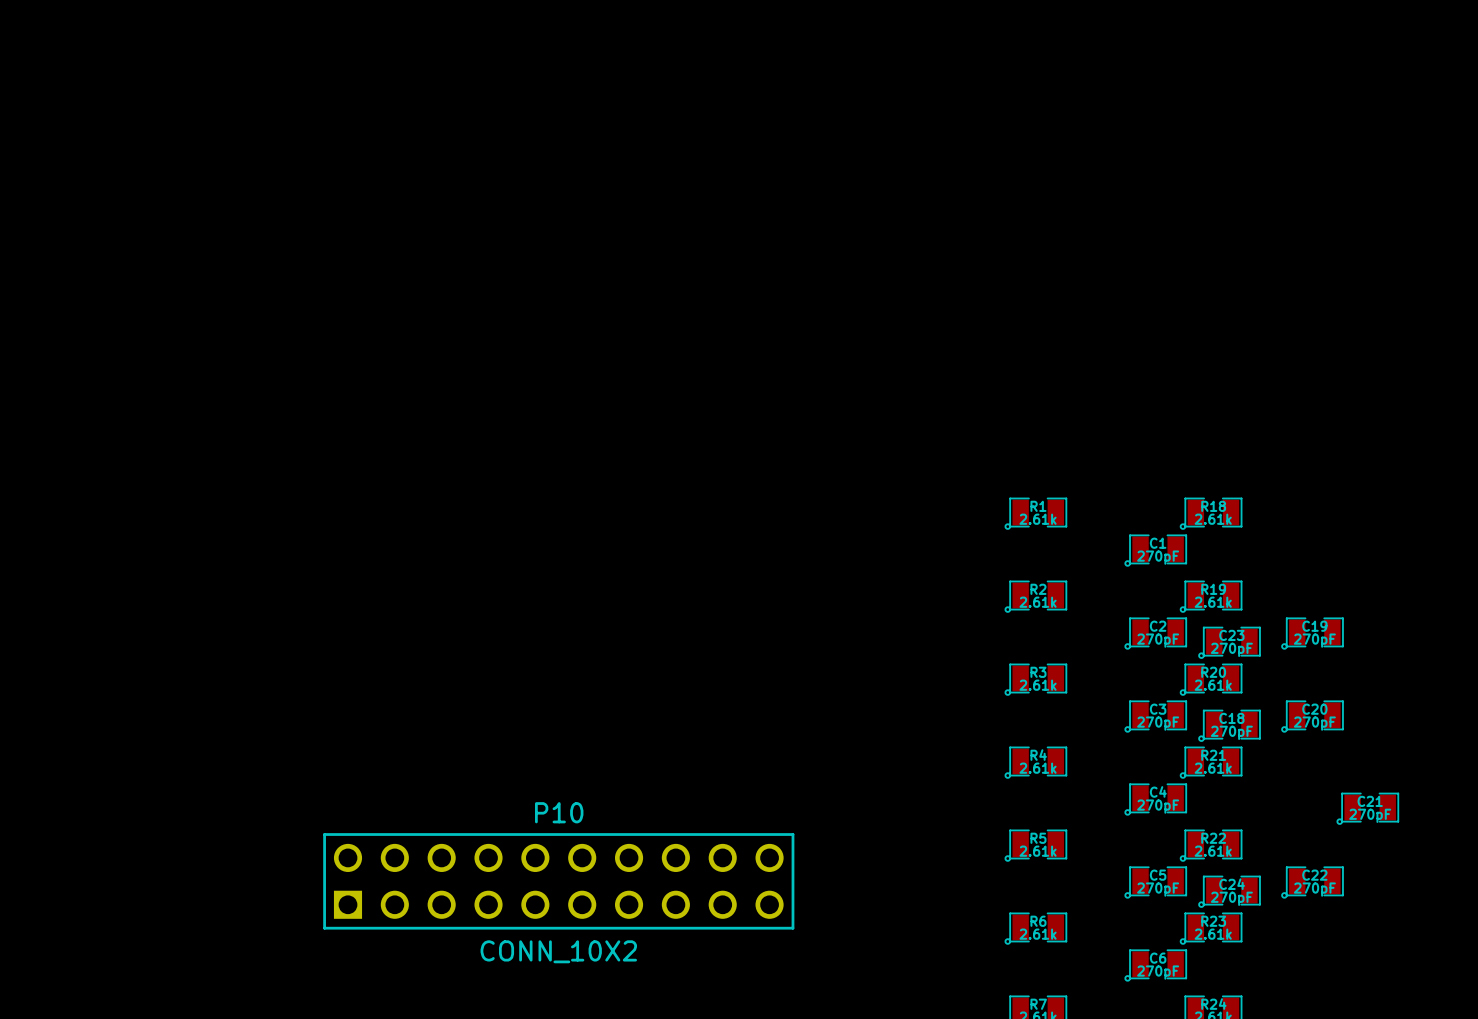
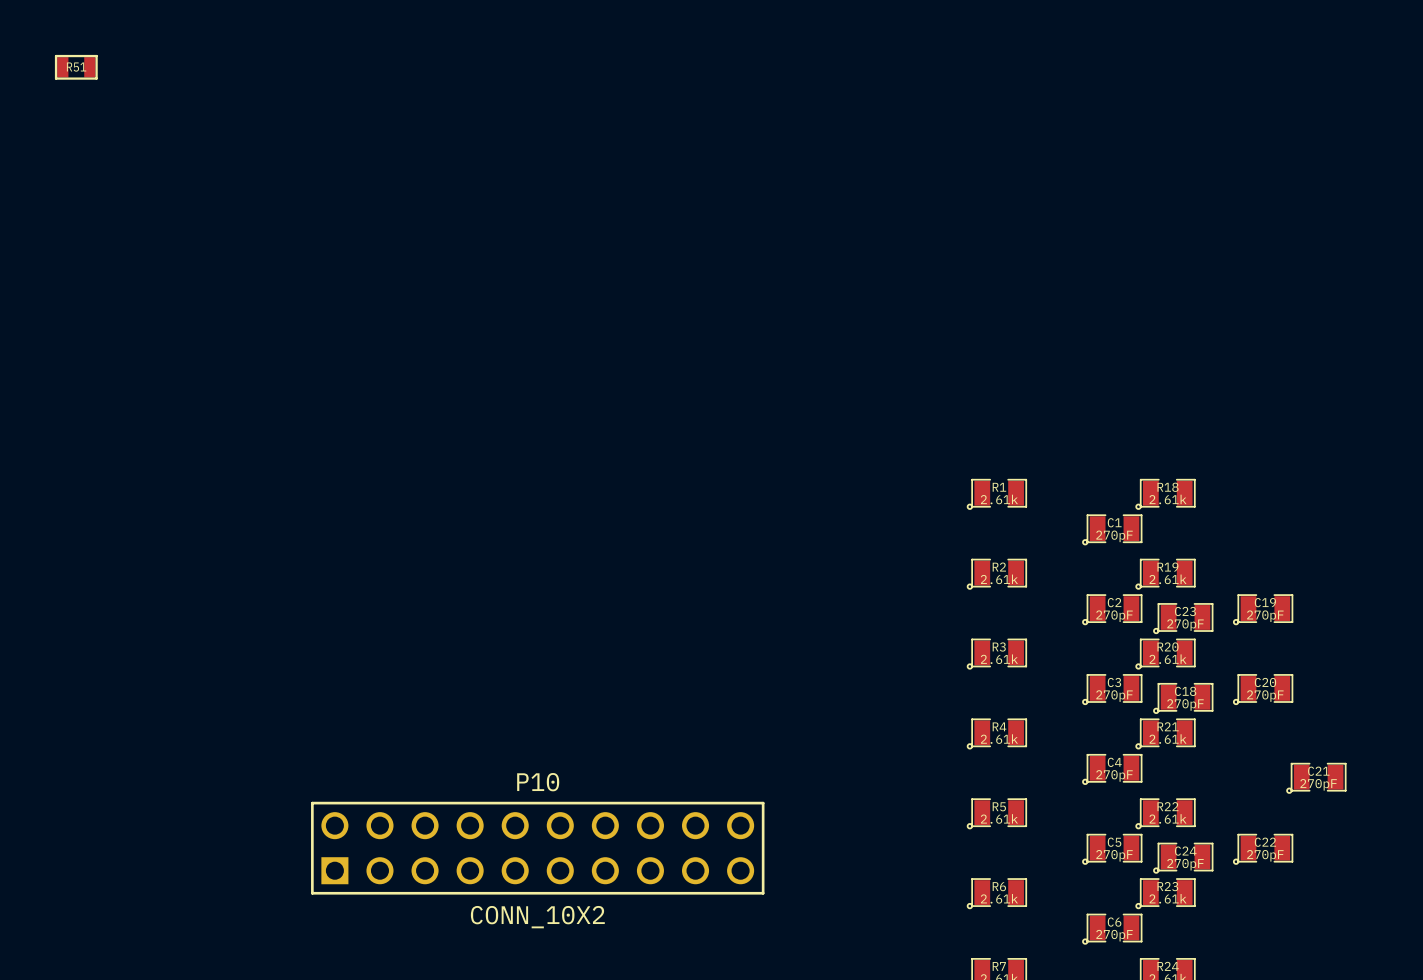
R51: none -> (76, 67)

